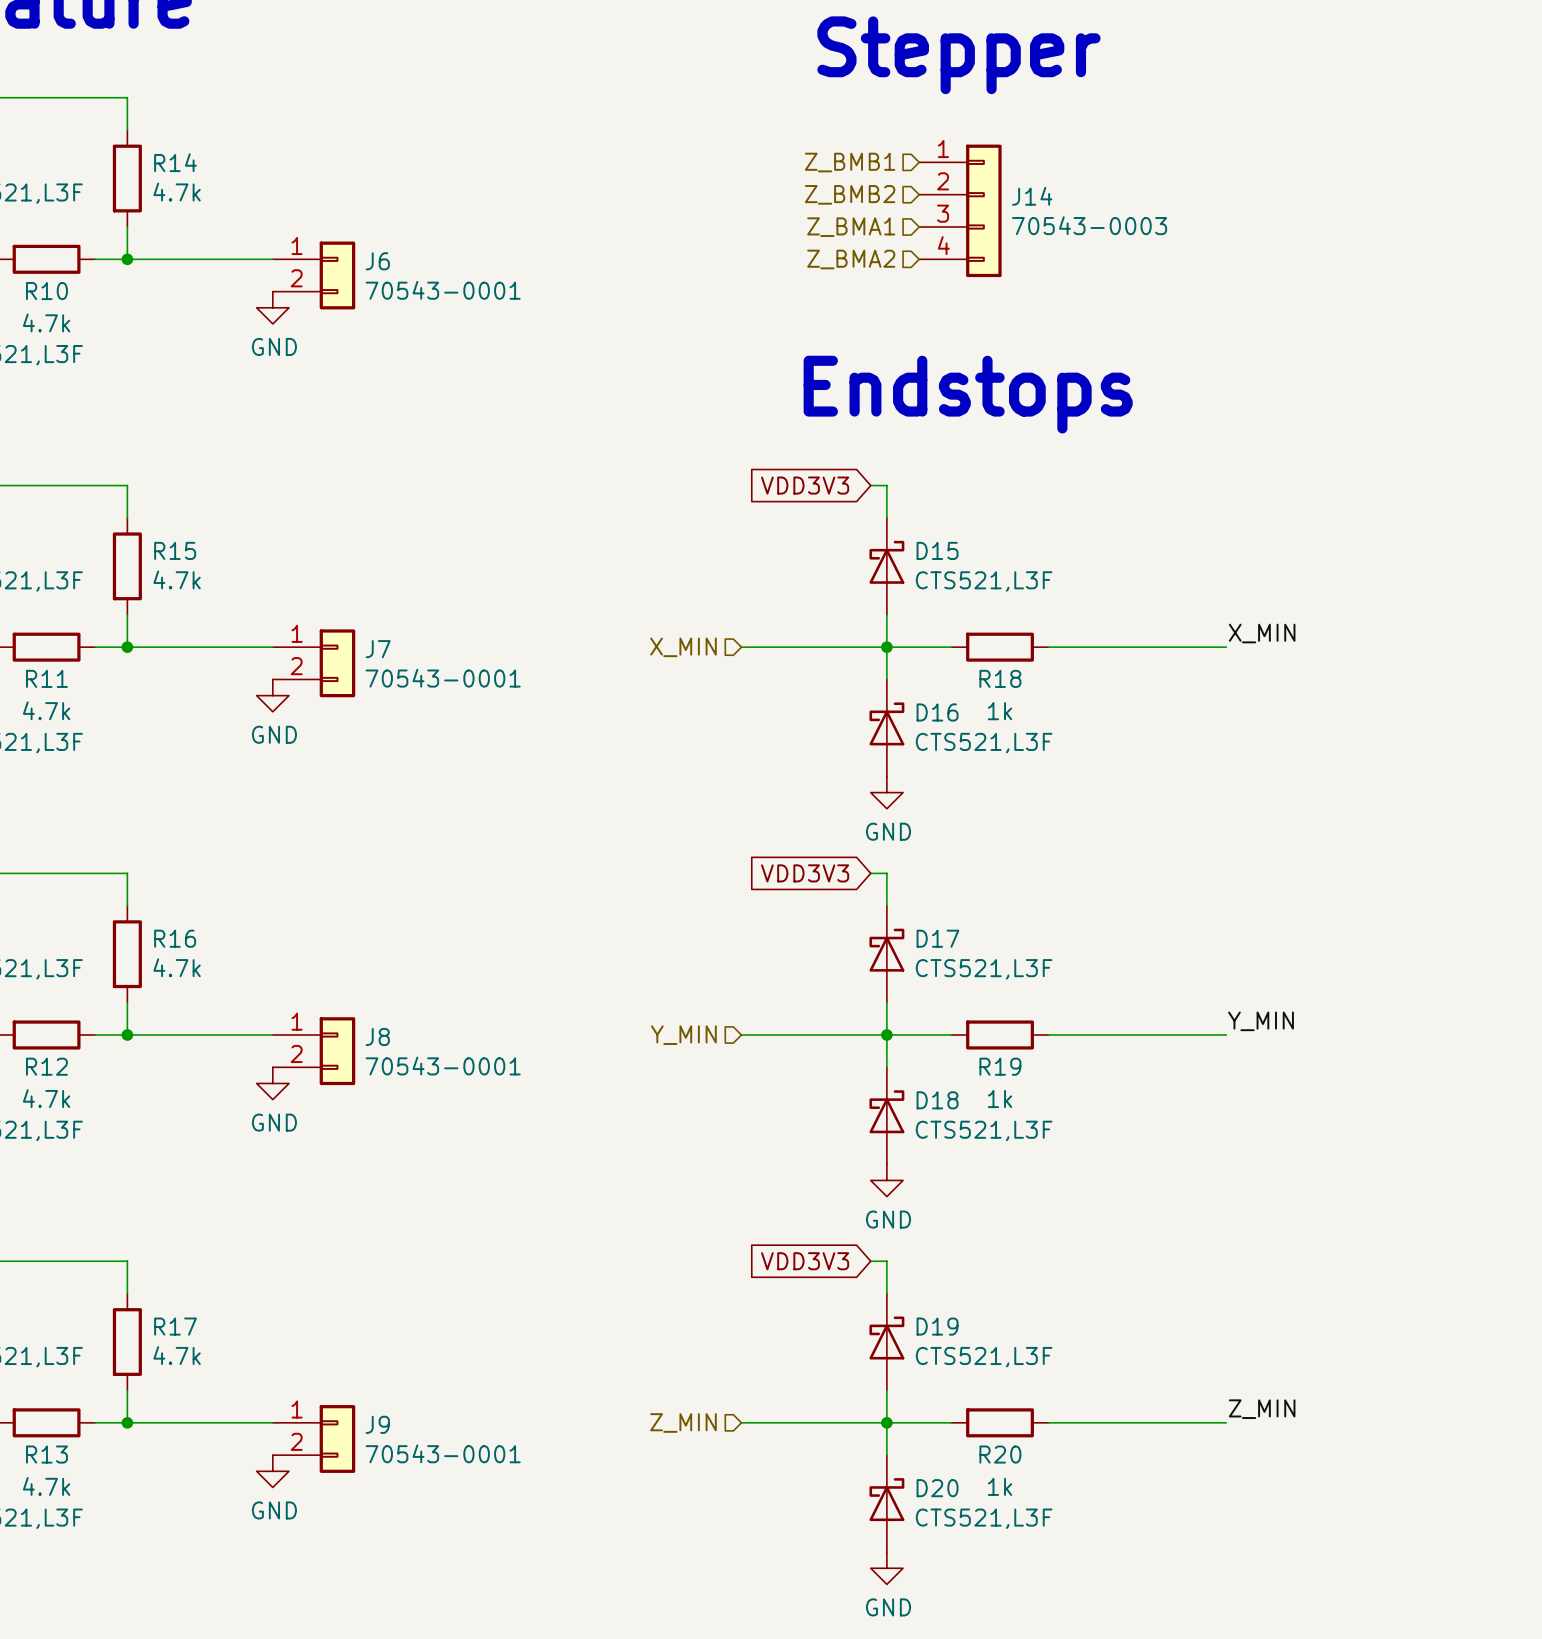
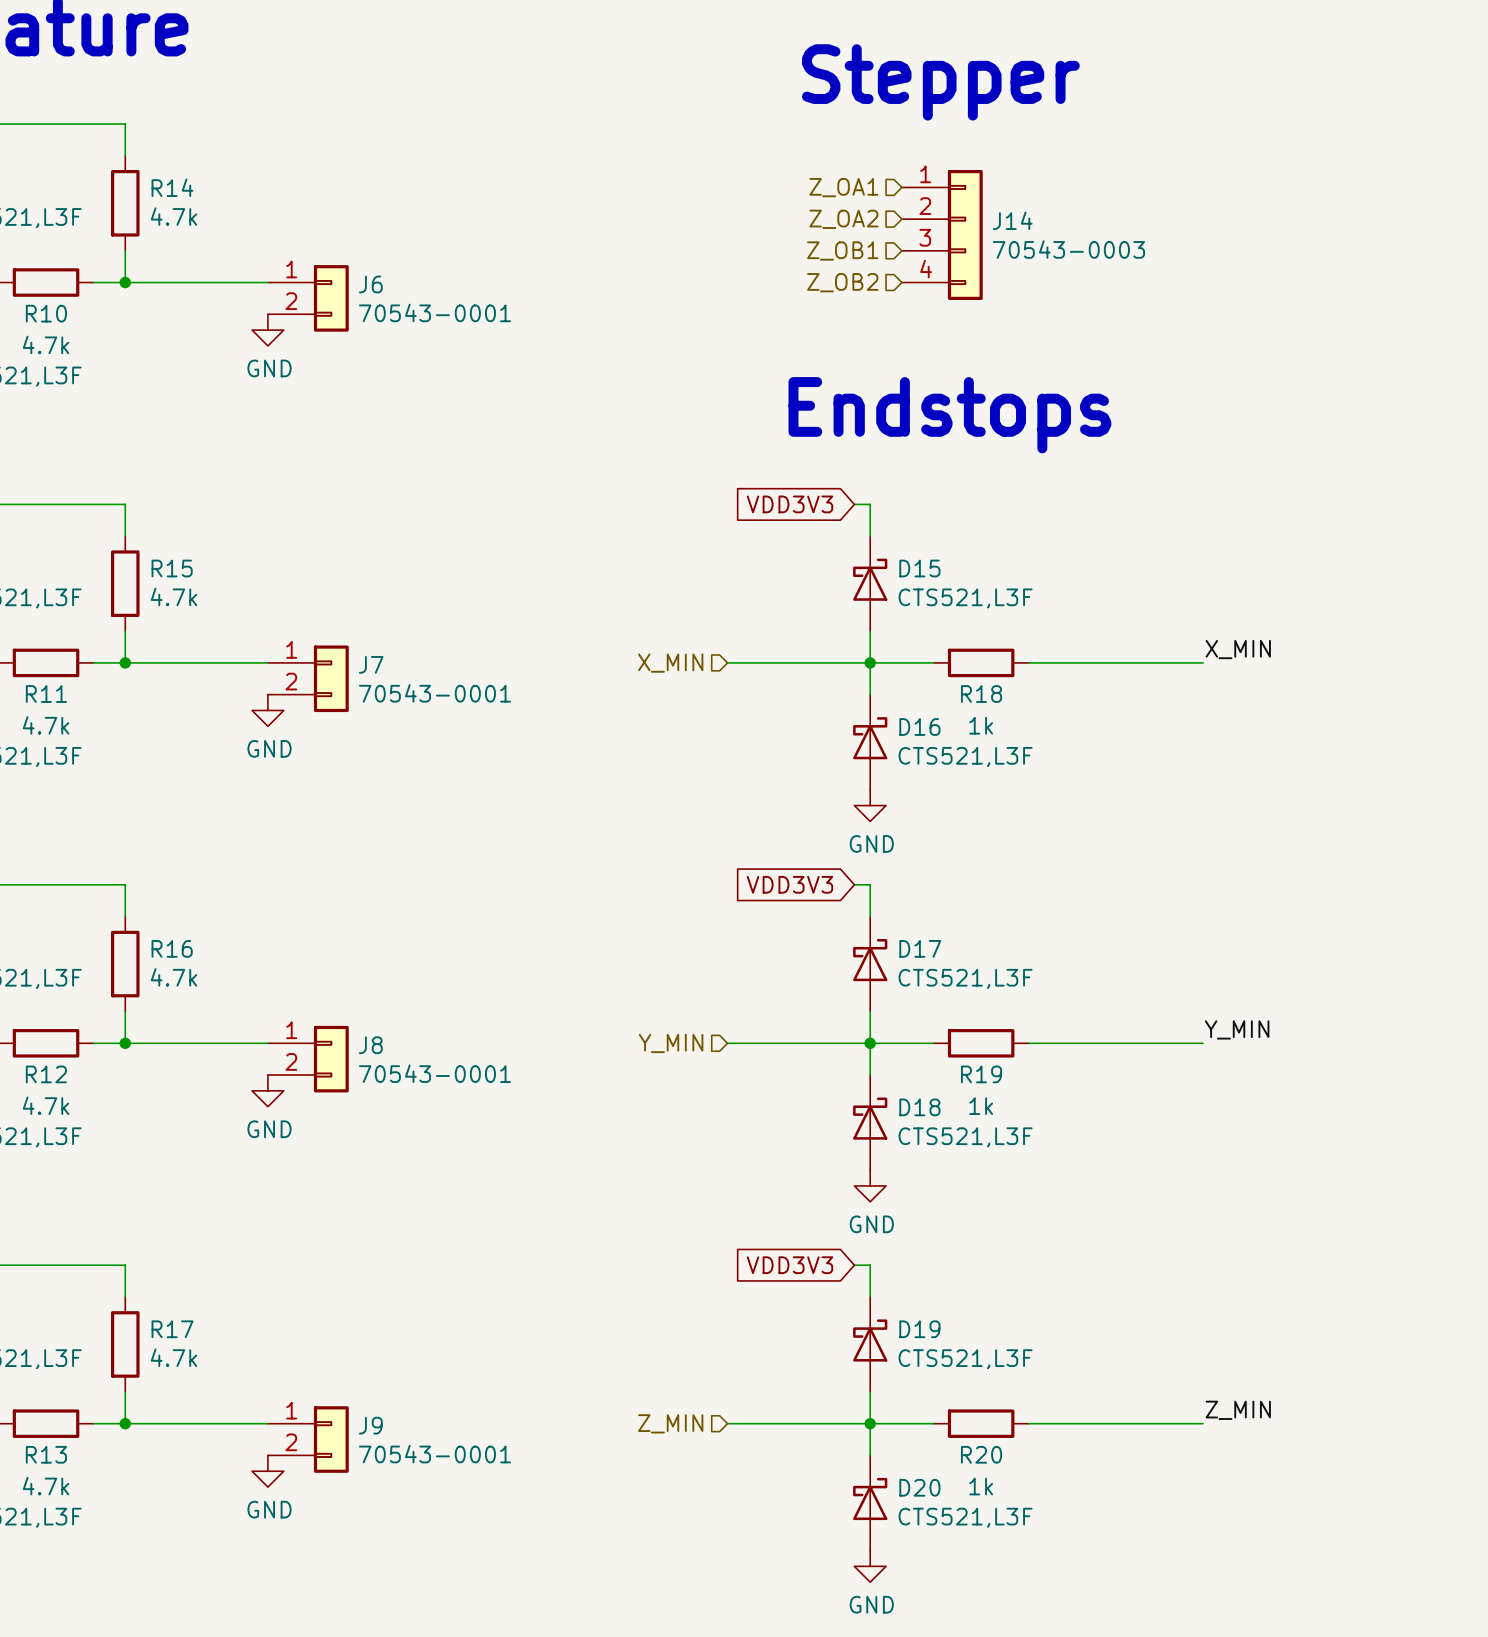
hierarchical label: Z_BMB1 (850, 162) -> Z_OA1 (843, 187)
hierarchical label: Z_BMB2 (850, 194) -> Z_OA2 (843, 219)
hierarchical label: Z_BMA1 (851, 227) -> Z_OB1 (842, 251)
hierarchical label: Z_BMA2 (851, 259) -> Z_OB2 (842, 282)

